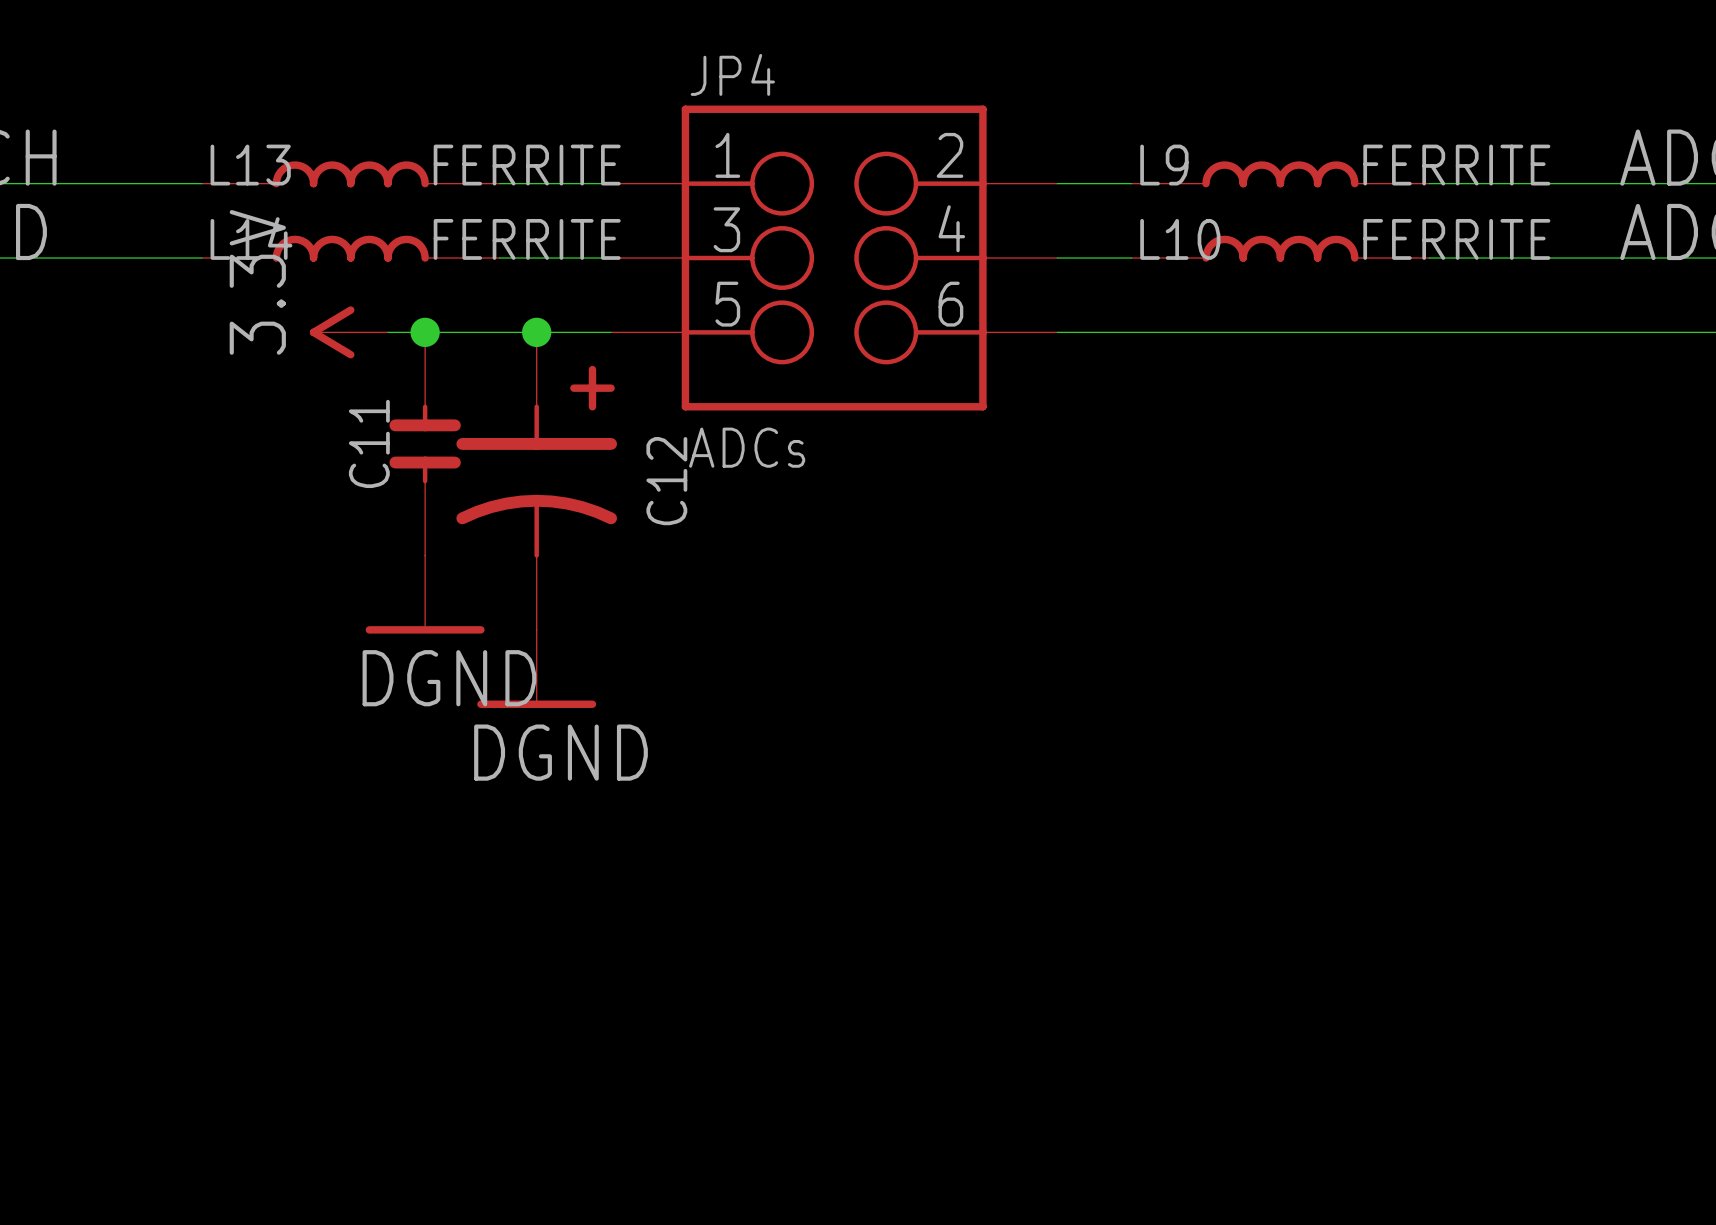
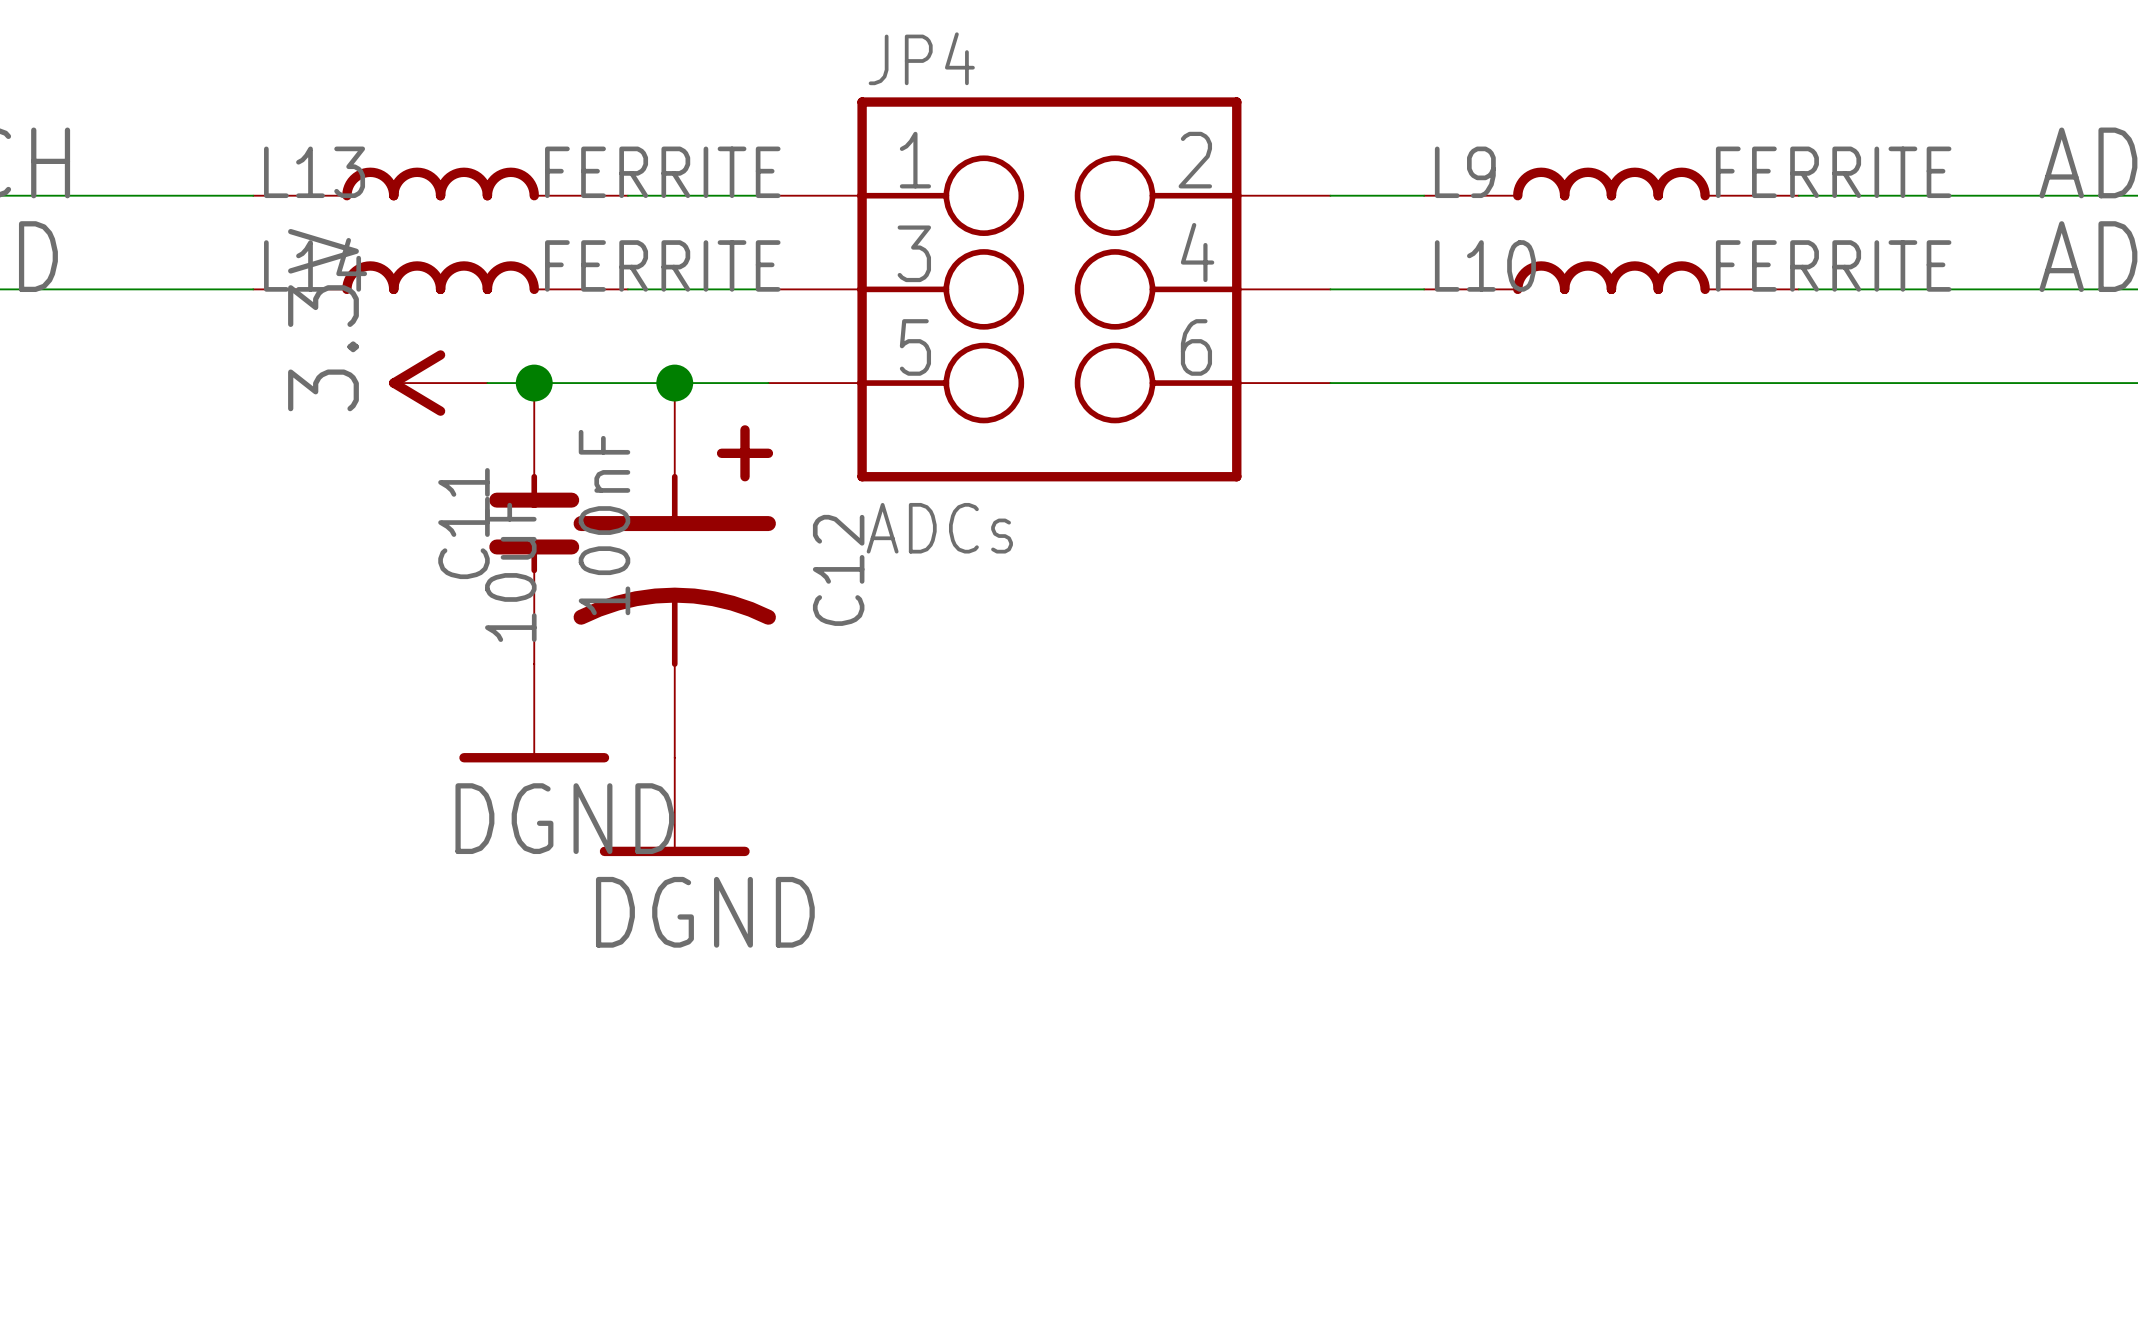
C11 value: none -> 100nF (604, 522)
C12 value: none -> 10uF (510, 569)

